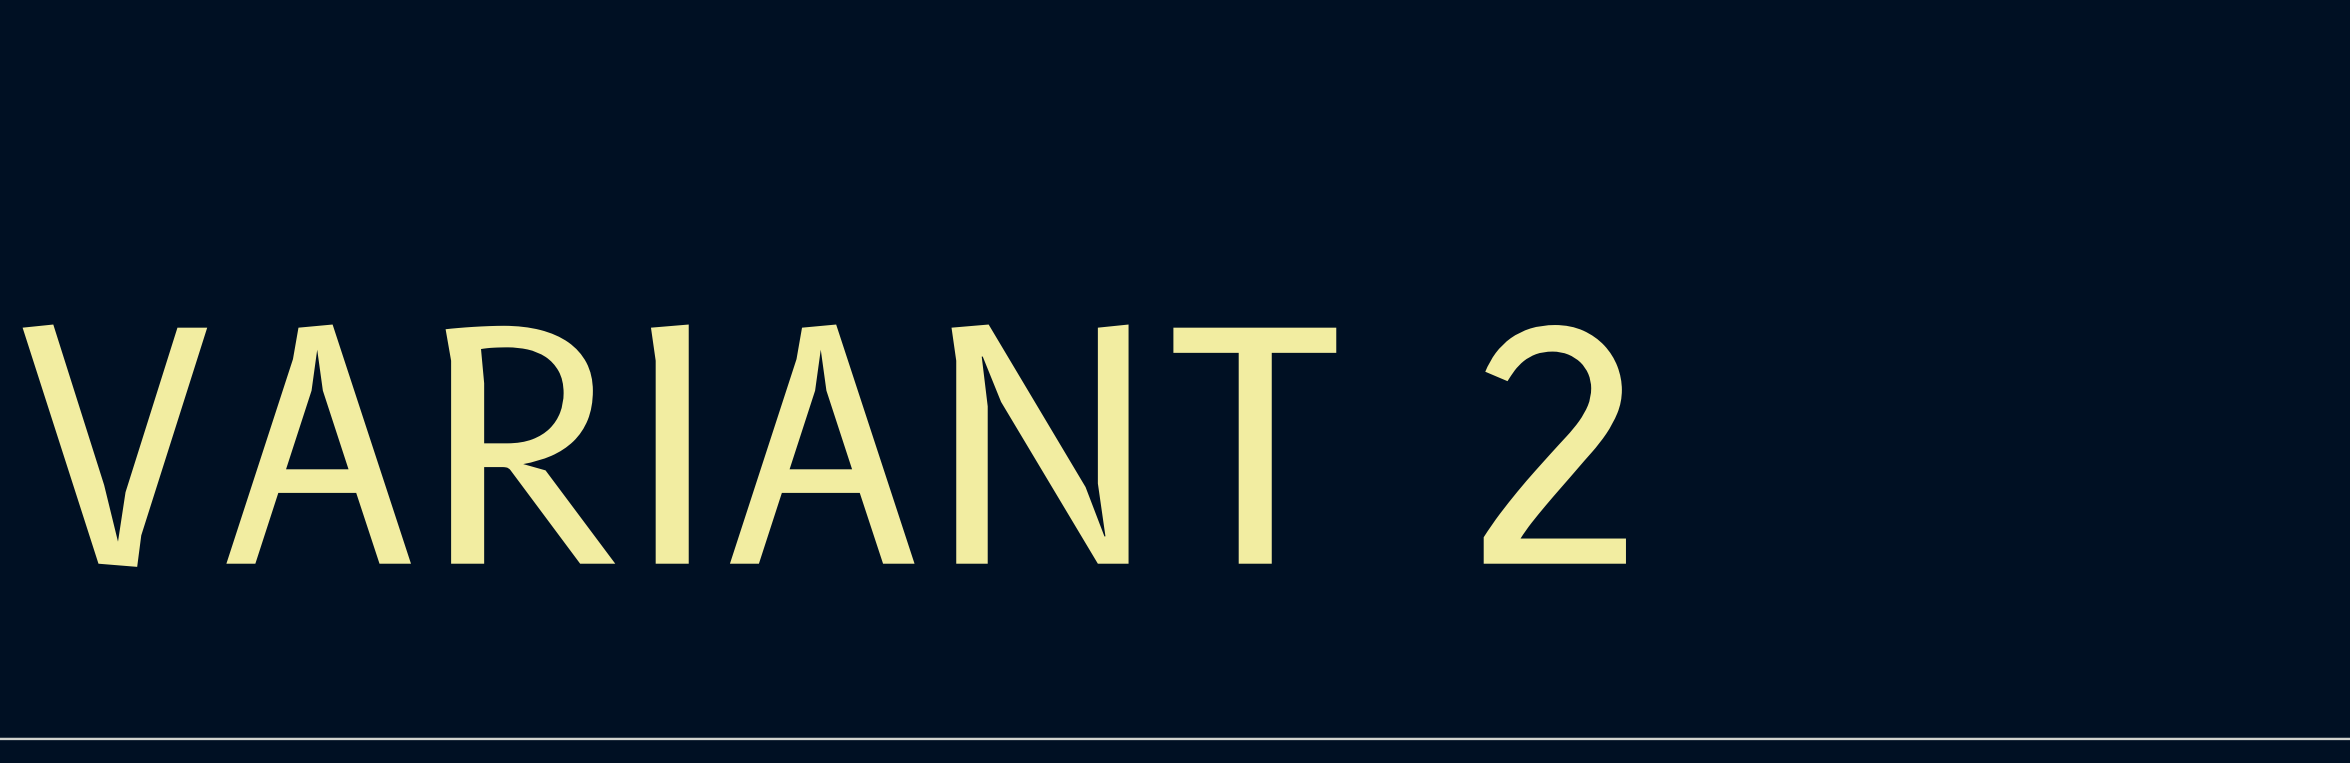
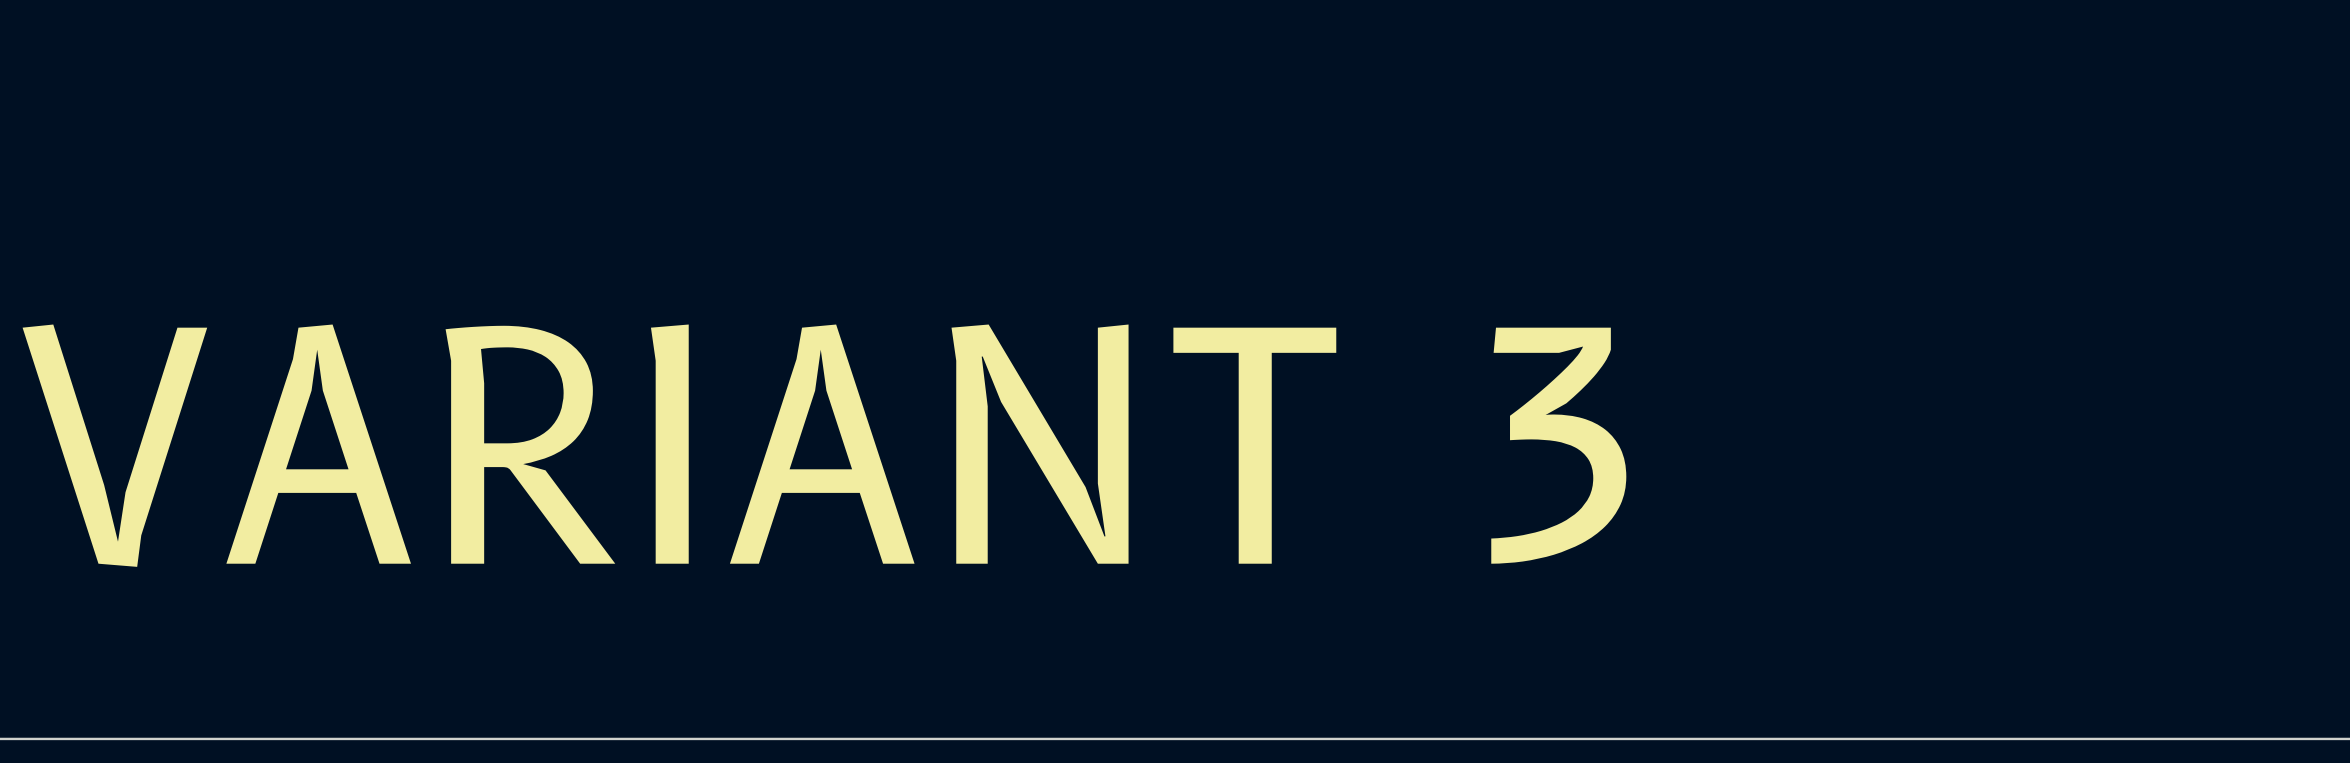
text: VARIANT 2 (824, 445) -> VARIANT 3 (824, 445)

